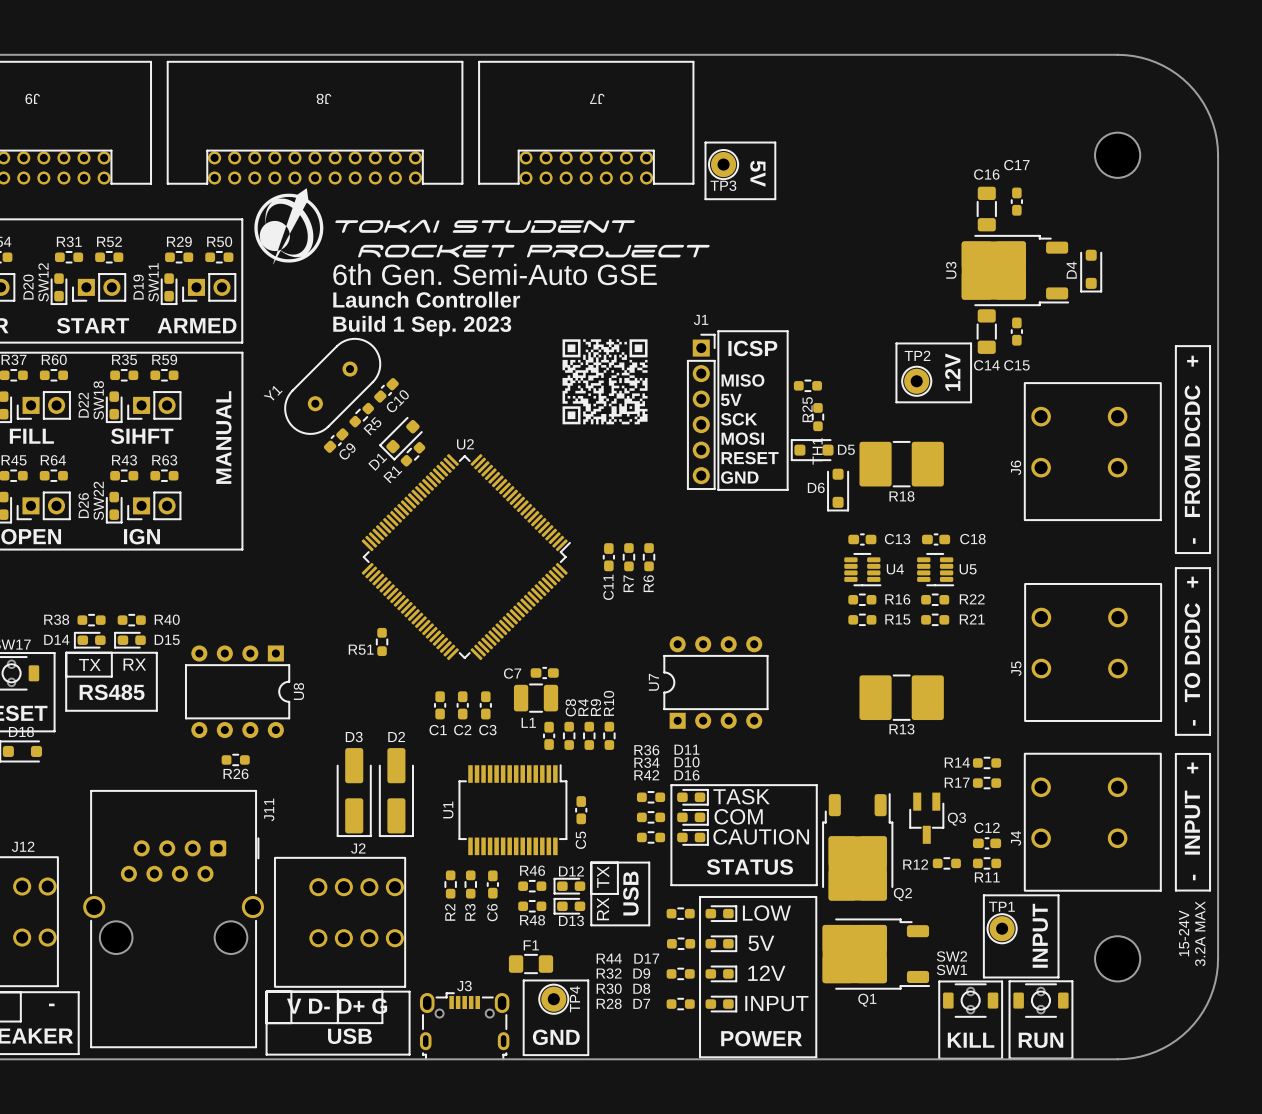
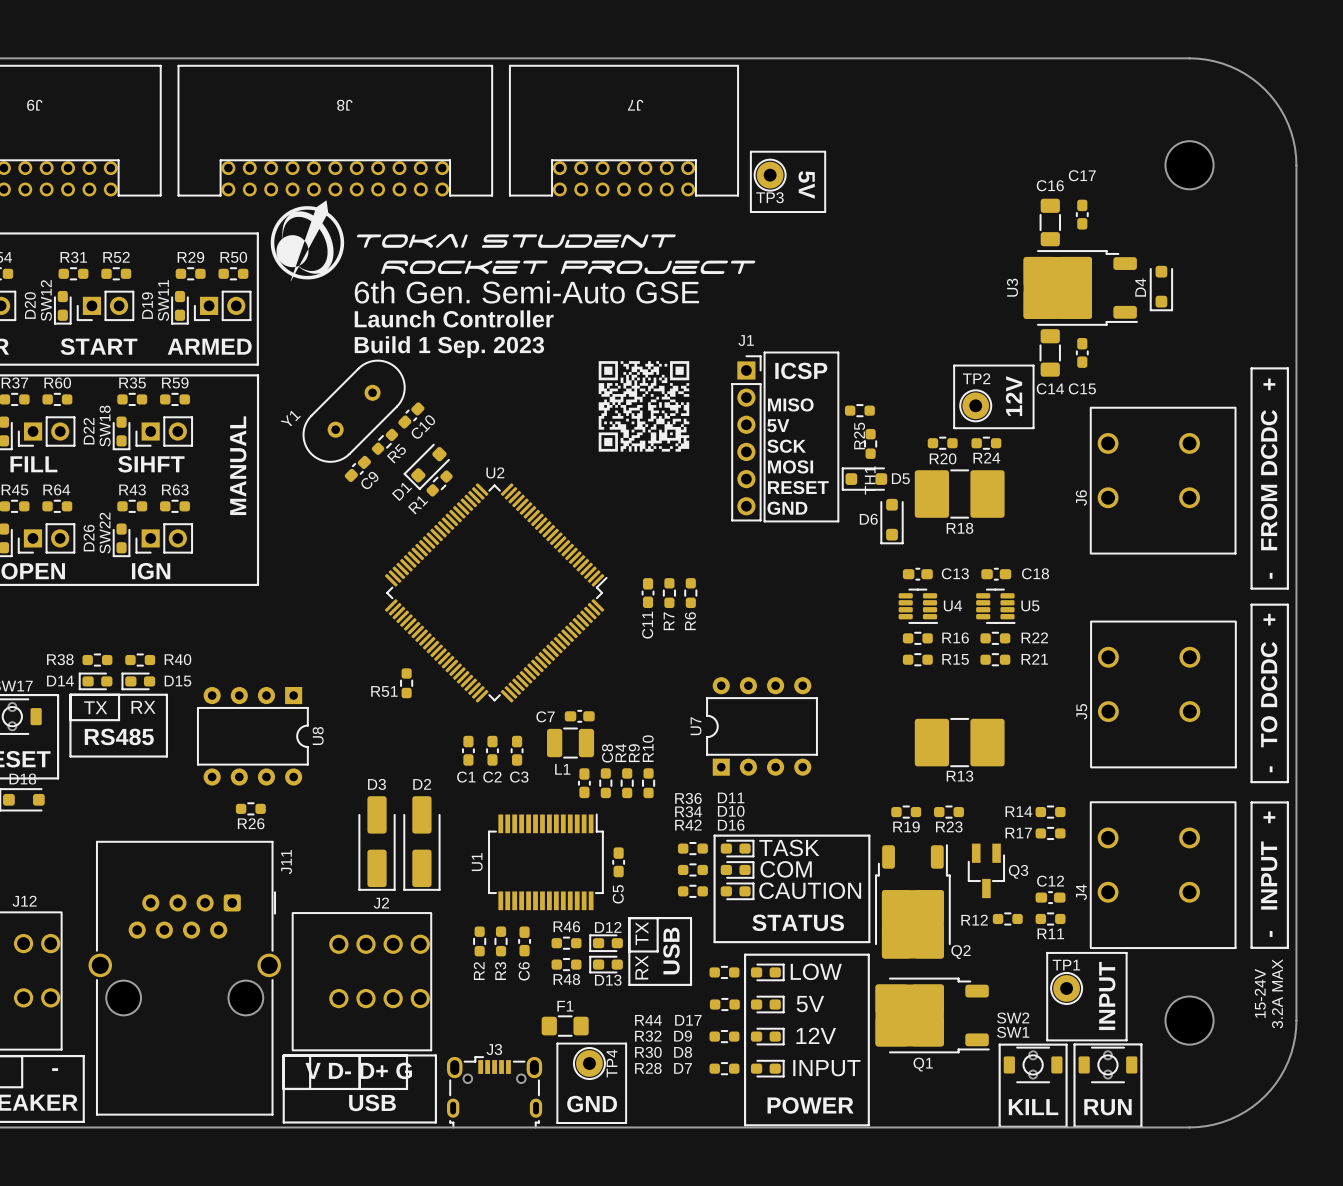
R20: none -> (942, 443)
R24: none -> (986, 443)
R19: none -> (906, 812)
R23: none -> (948, 812)

